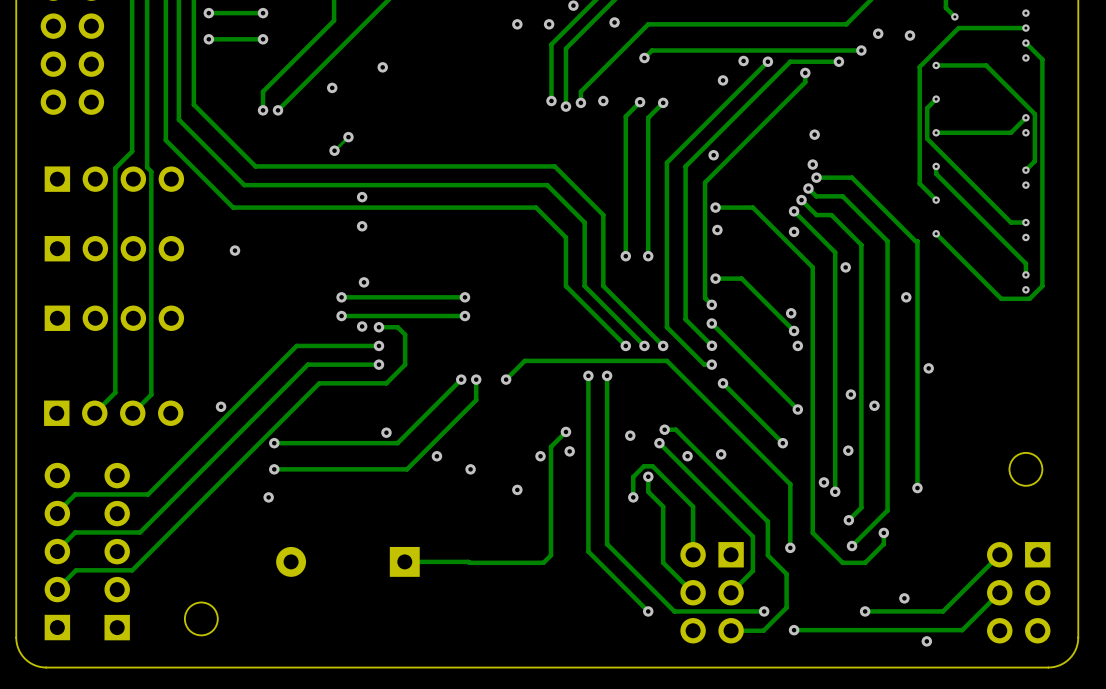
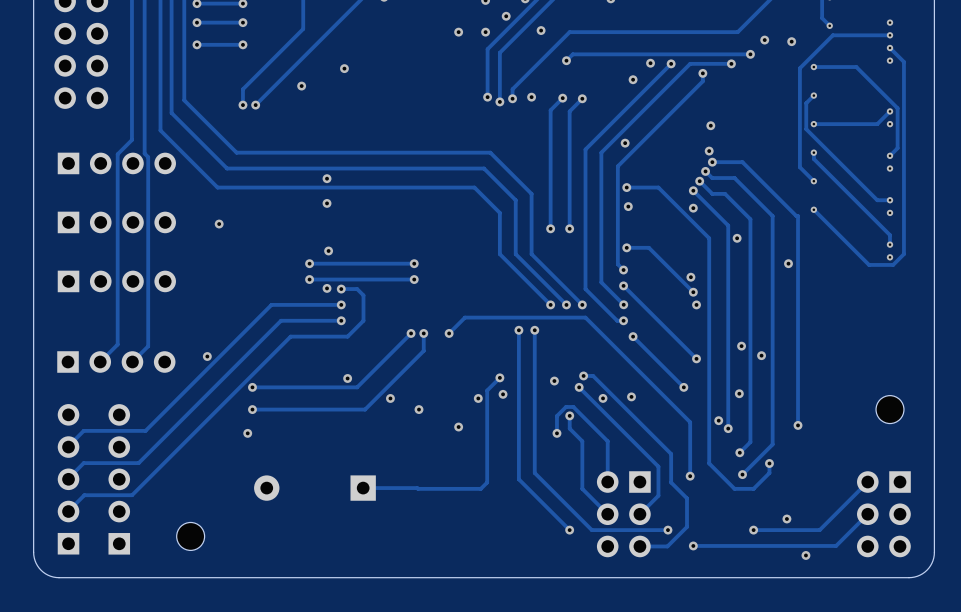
track: (348, 137) (334, 150) -> none
via: (348, 137) -> none
via: (334, 150) -> none
via: (928, 368) -> none

